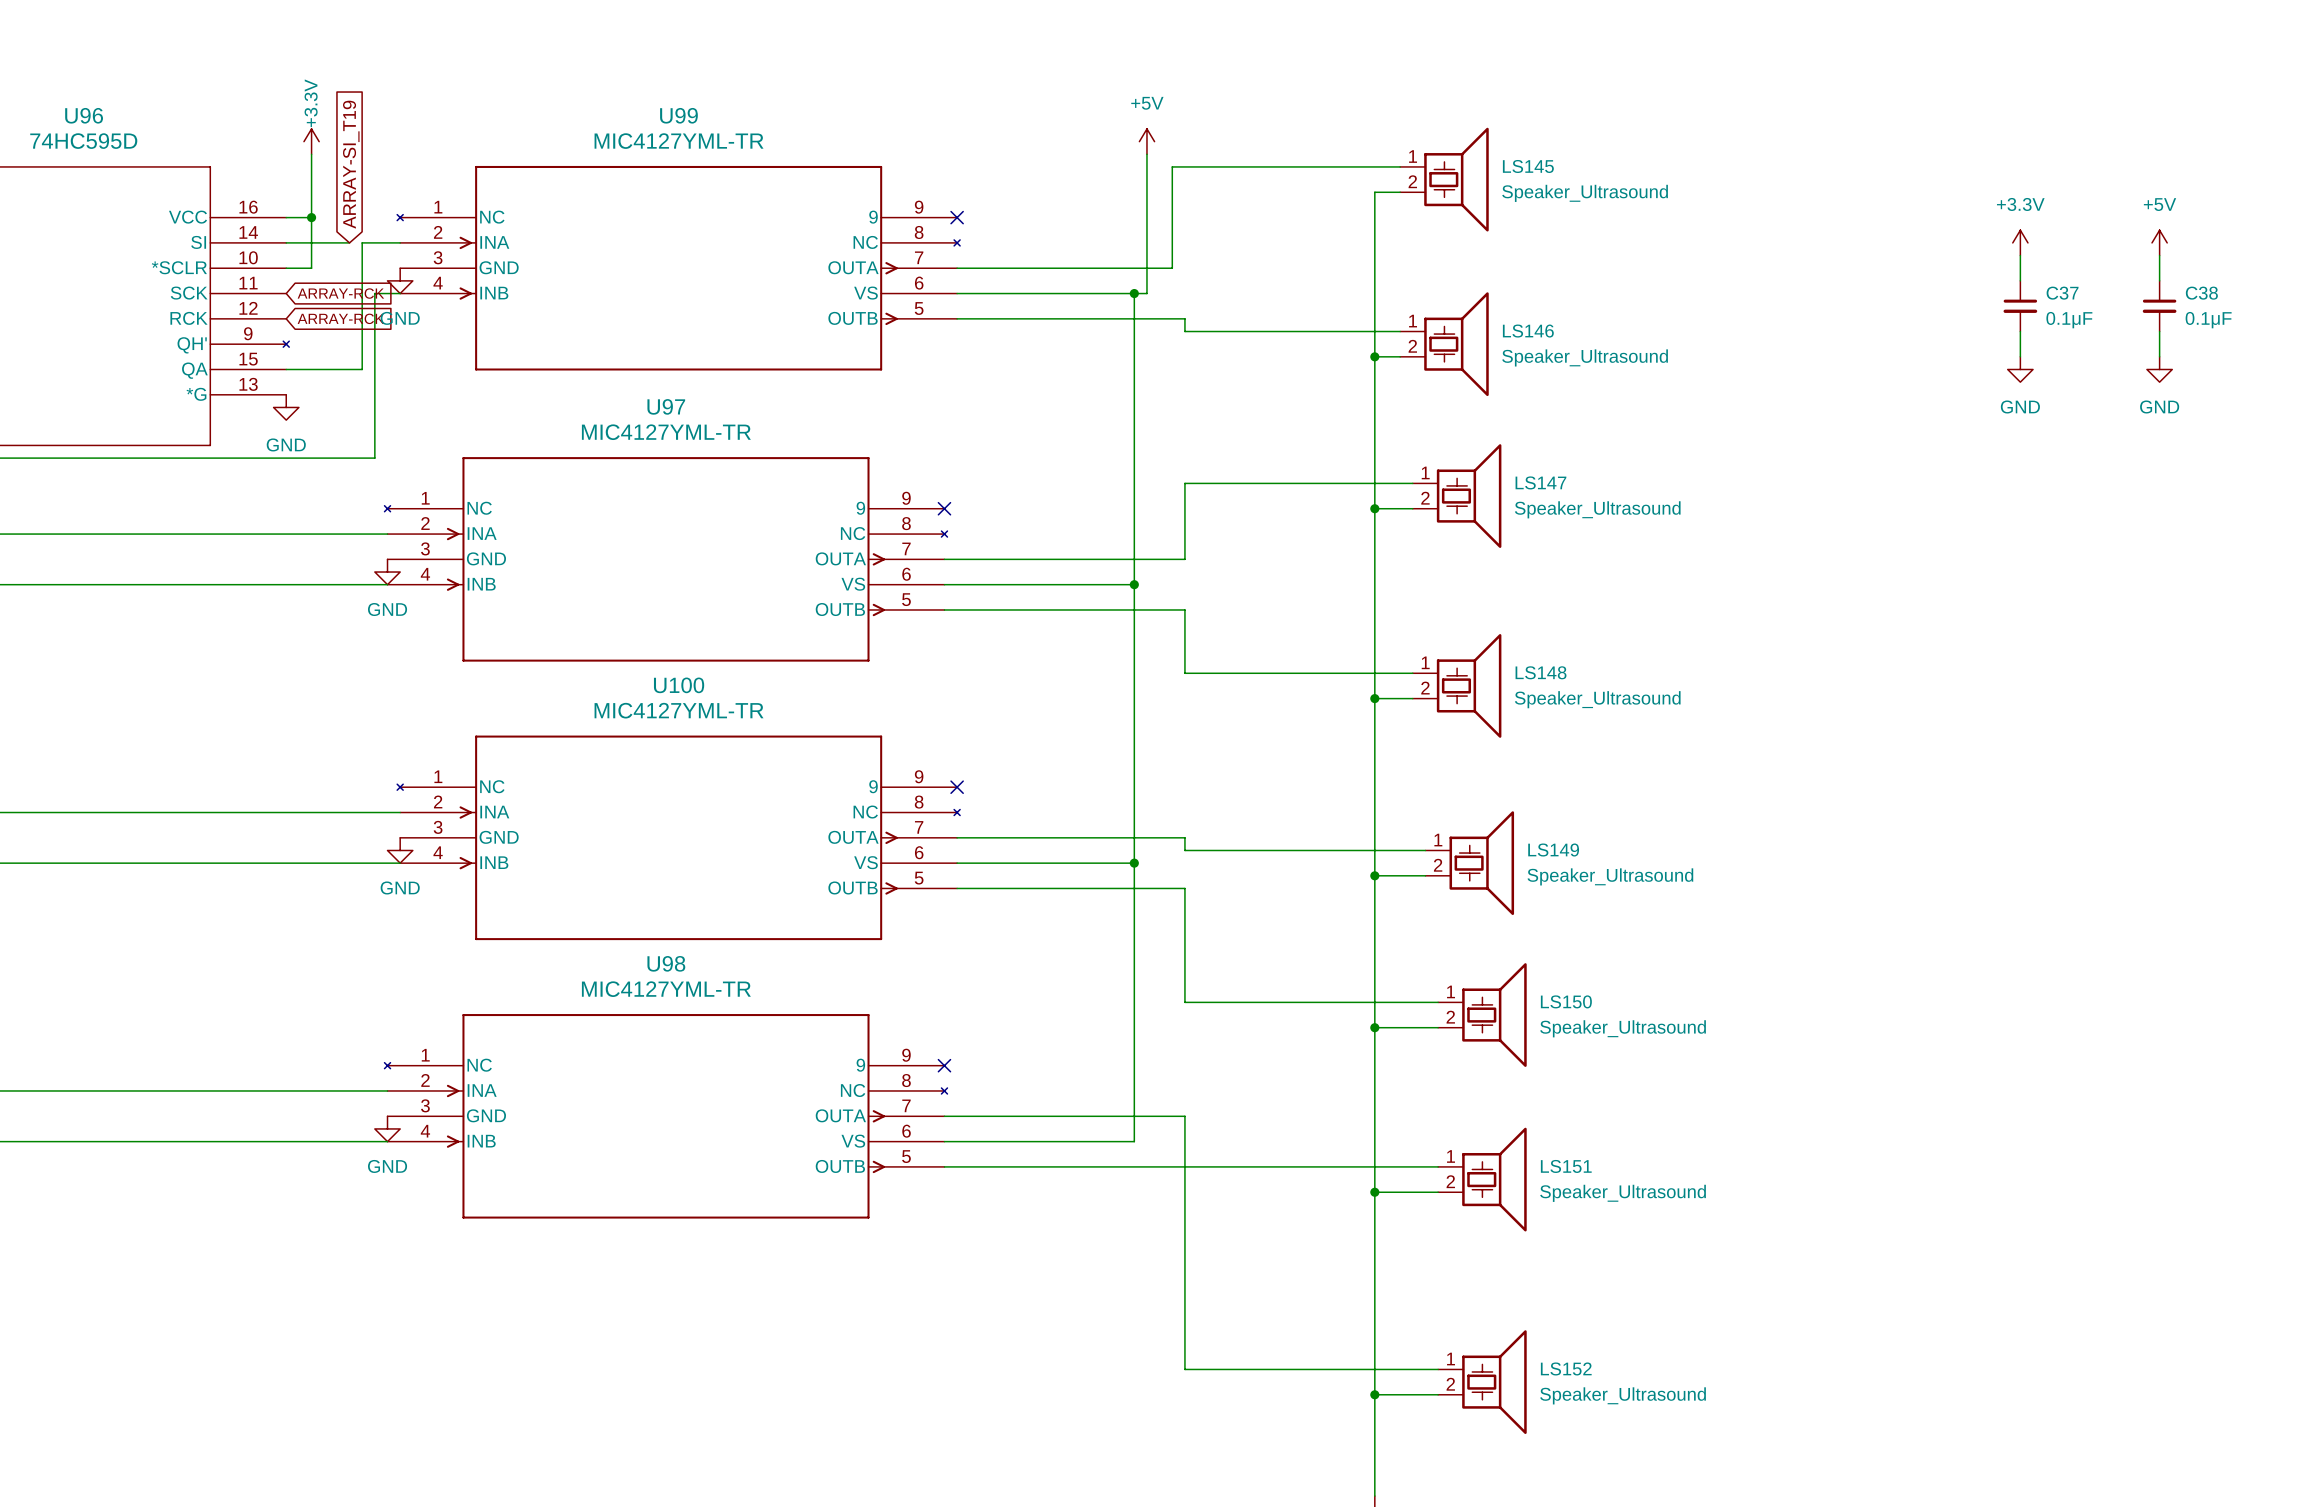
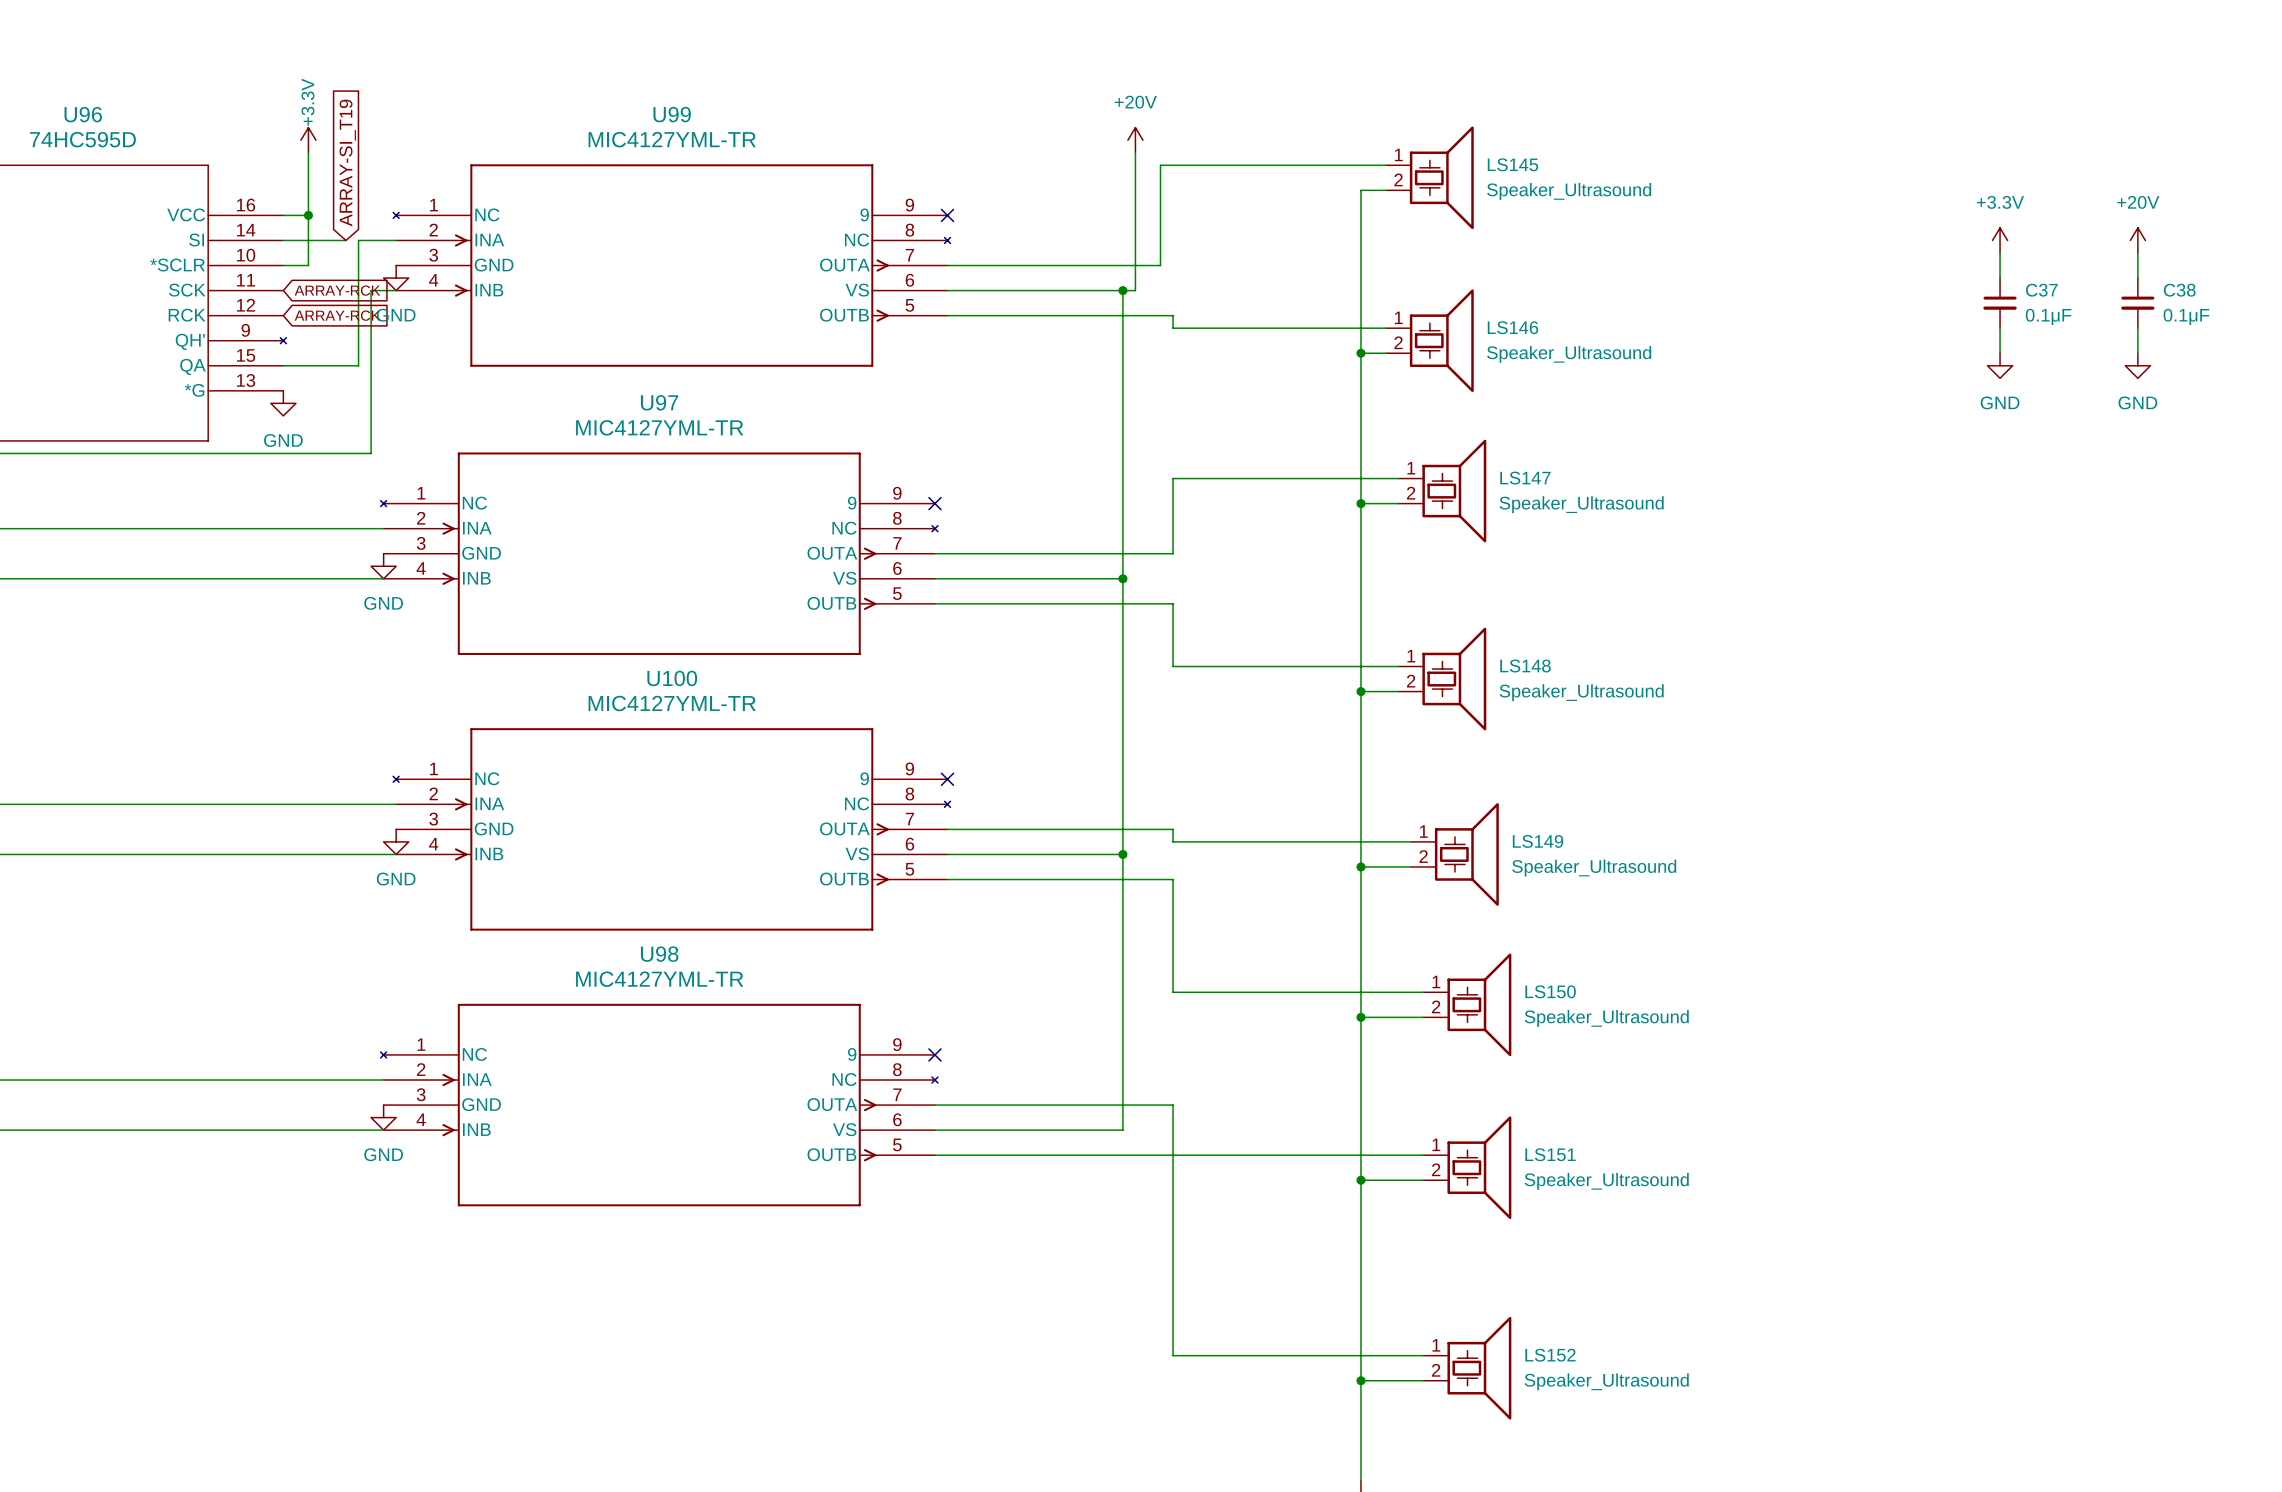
power symbol: +5V (1146, 141) -> +20V (1135, 140)
power symbol: +5V (2159, 242) -> +20V (2137, 240)

